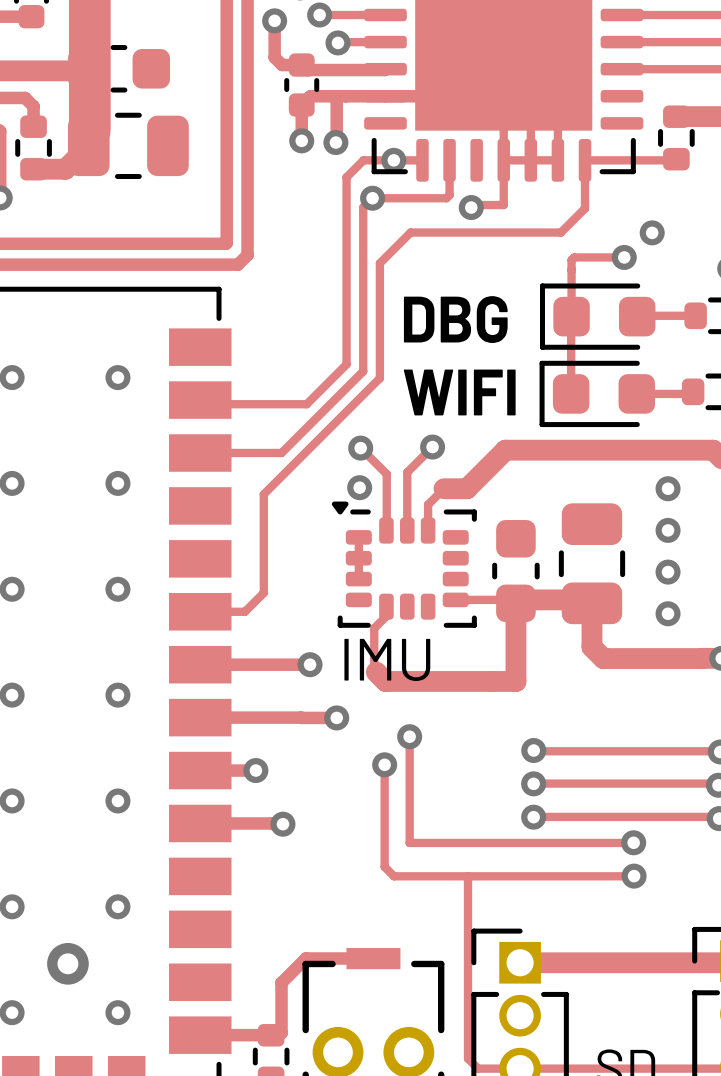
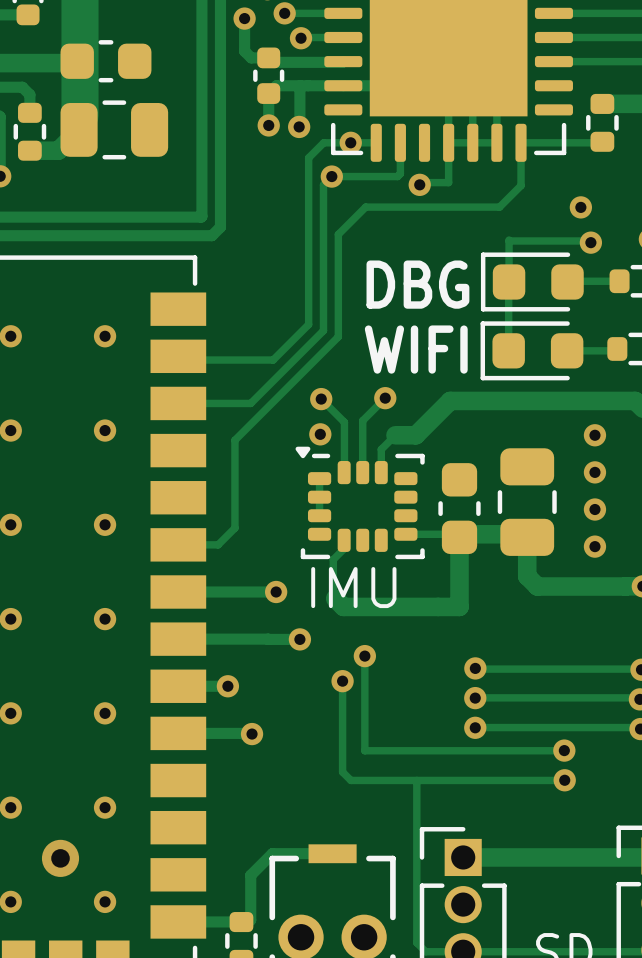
track: (624, 257) (574, 257) (571, 260) (571, 269) -> (590, 242) (589, 240) (509, 240)
via position: (624, 257) -> (590, 242)

